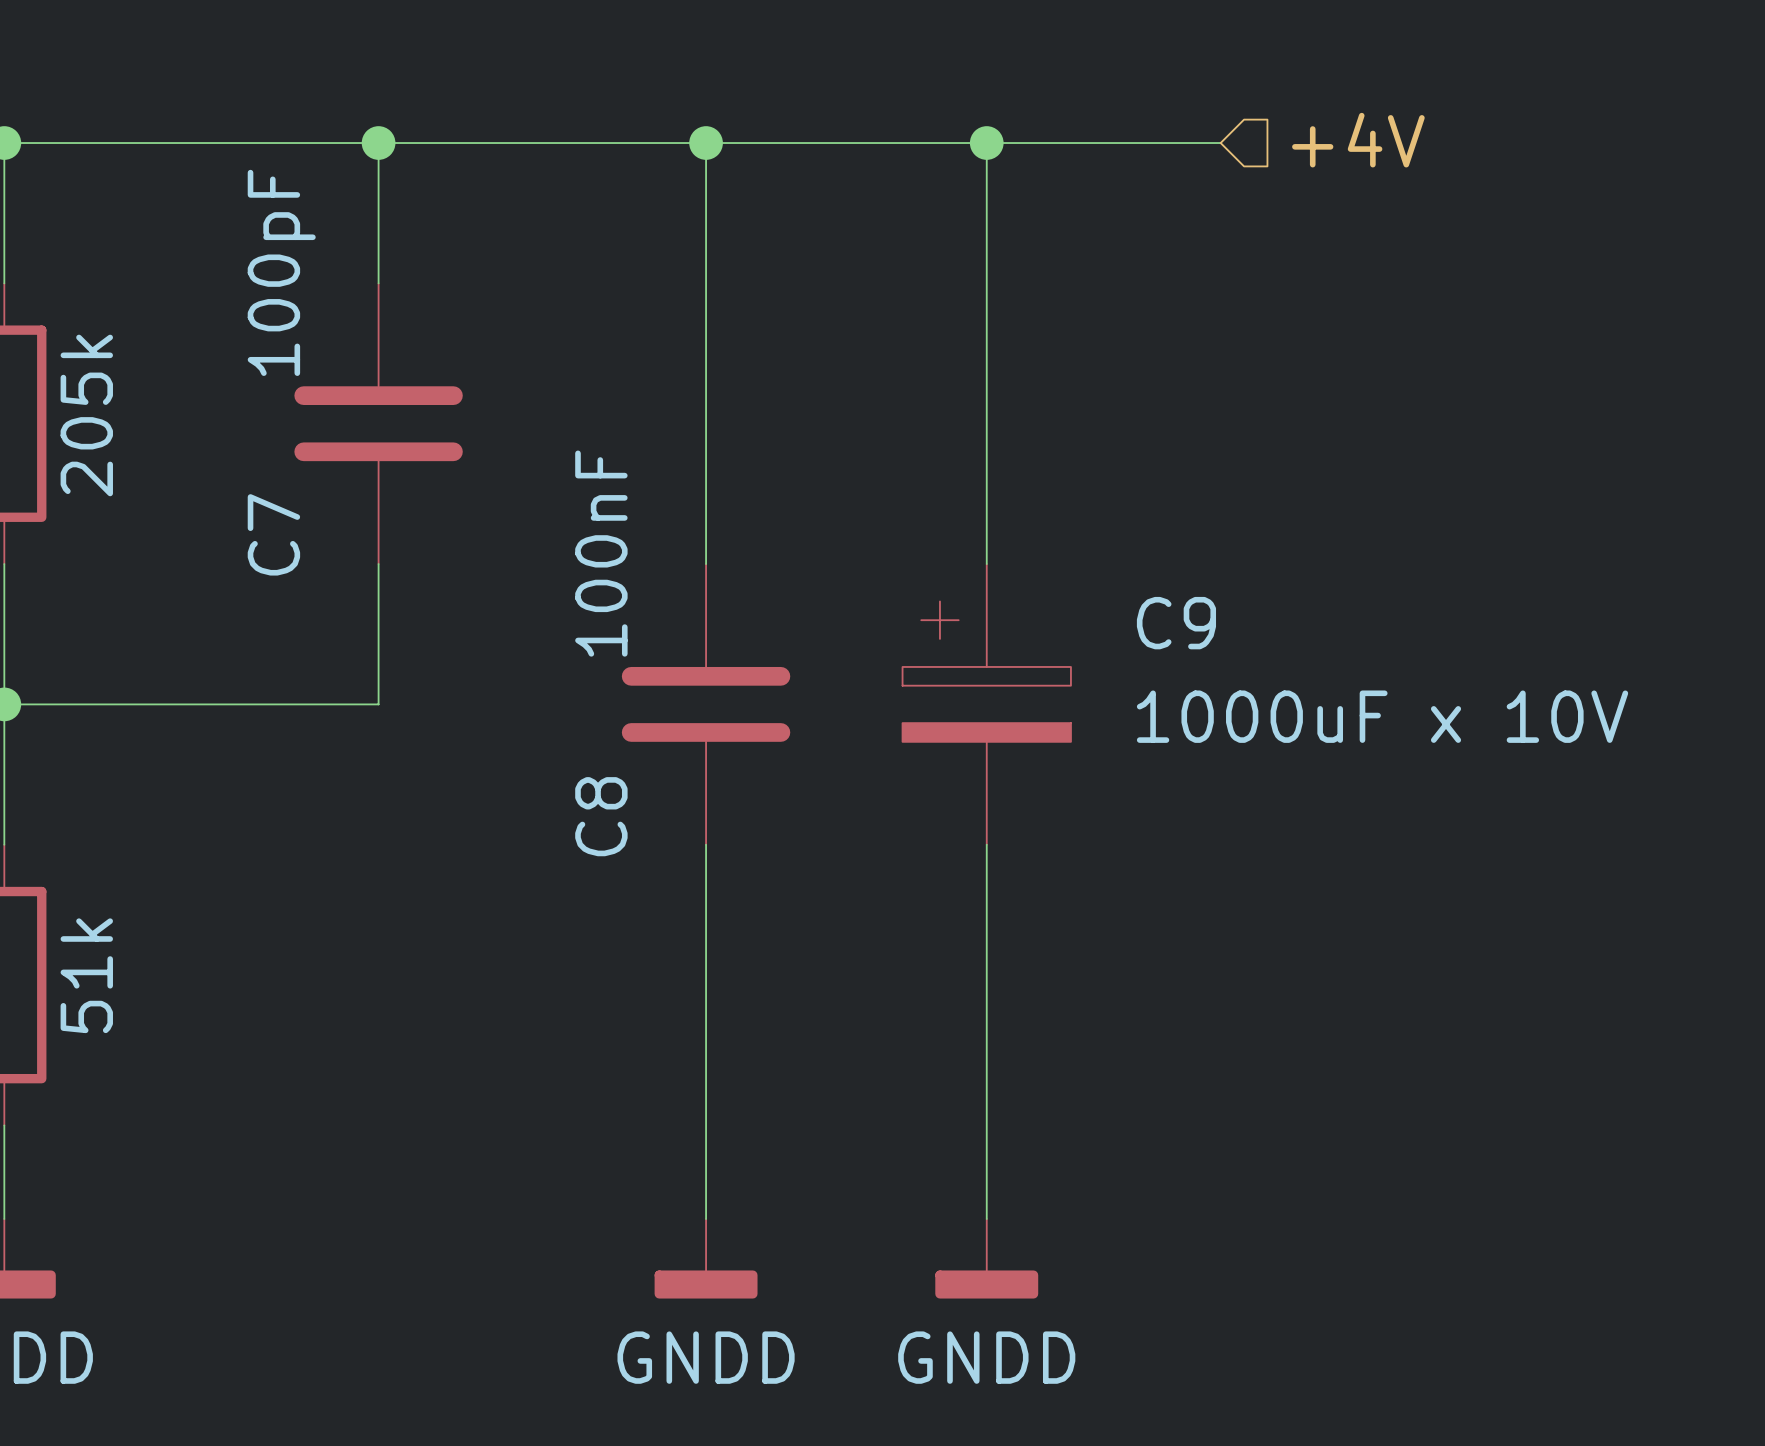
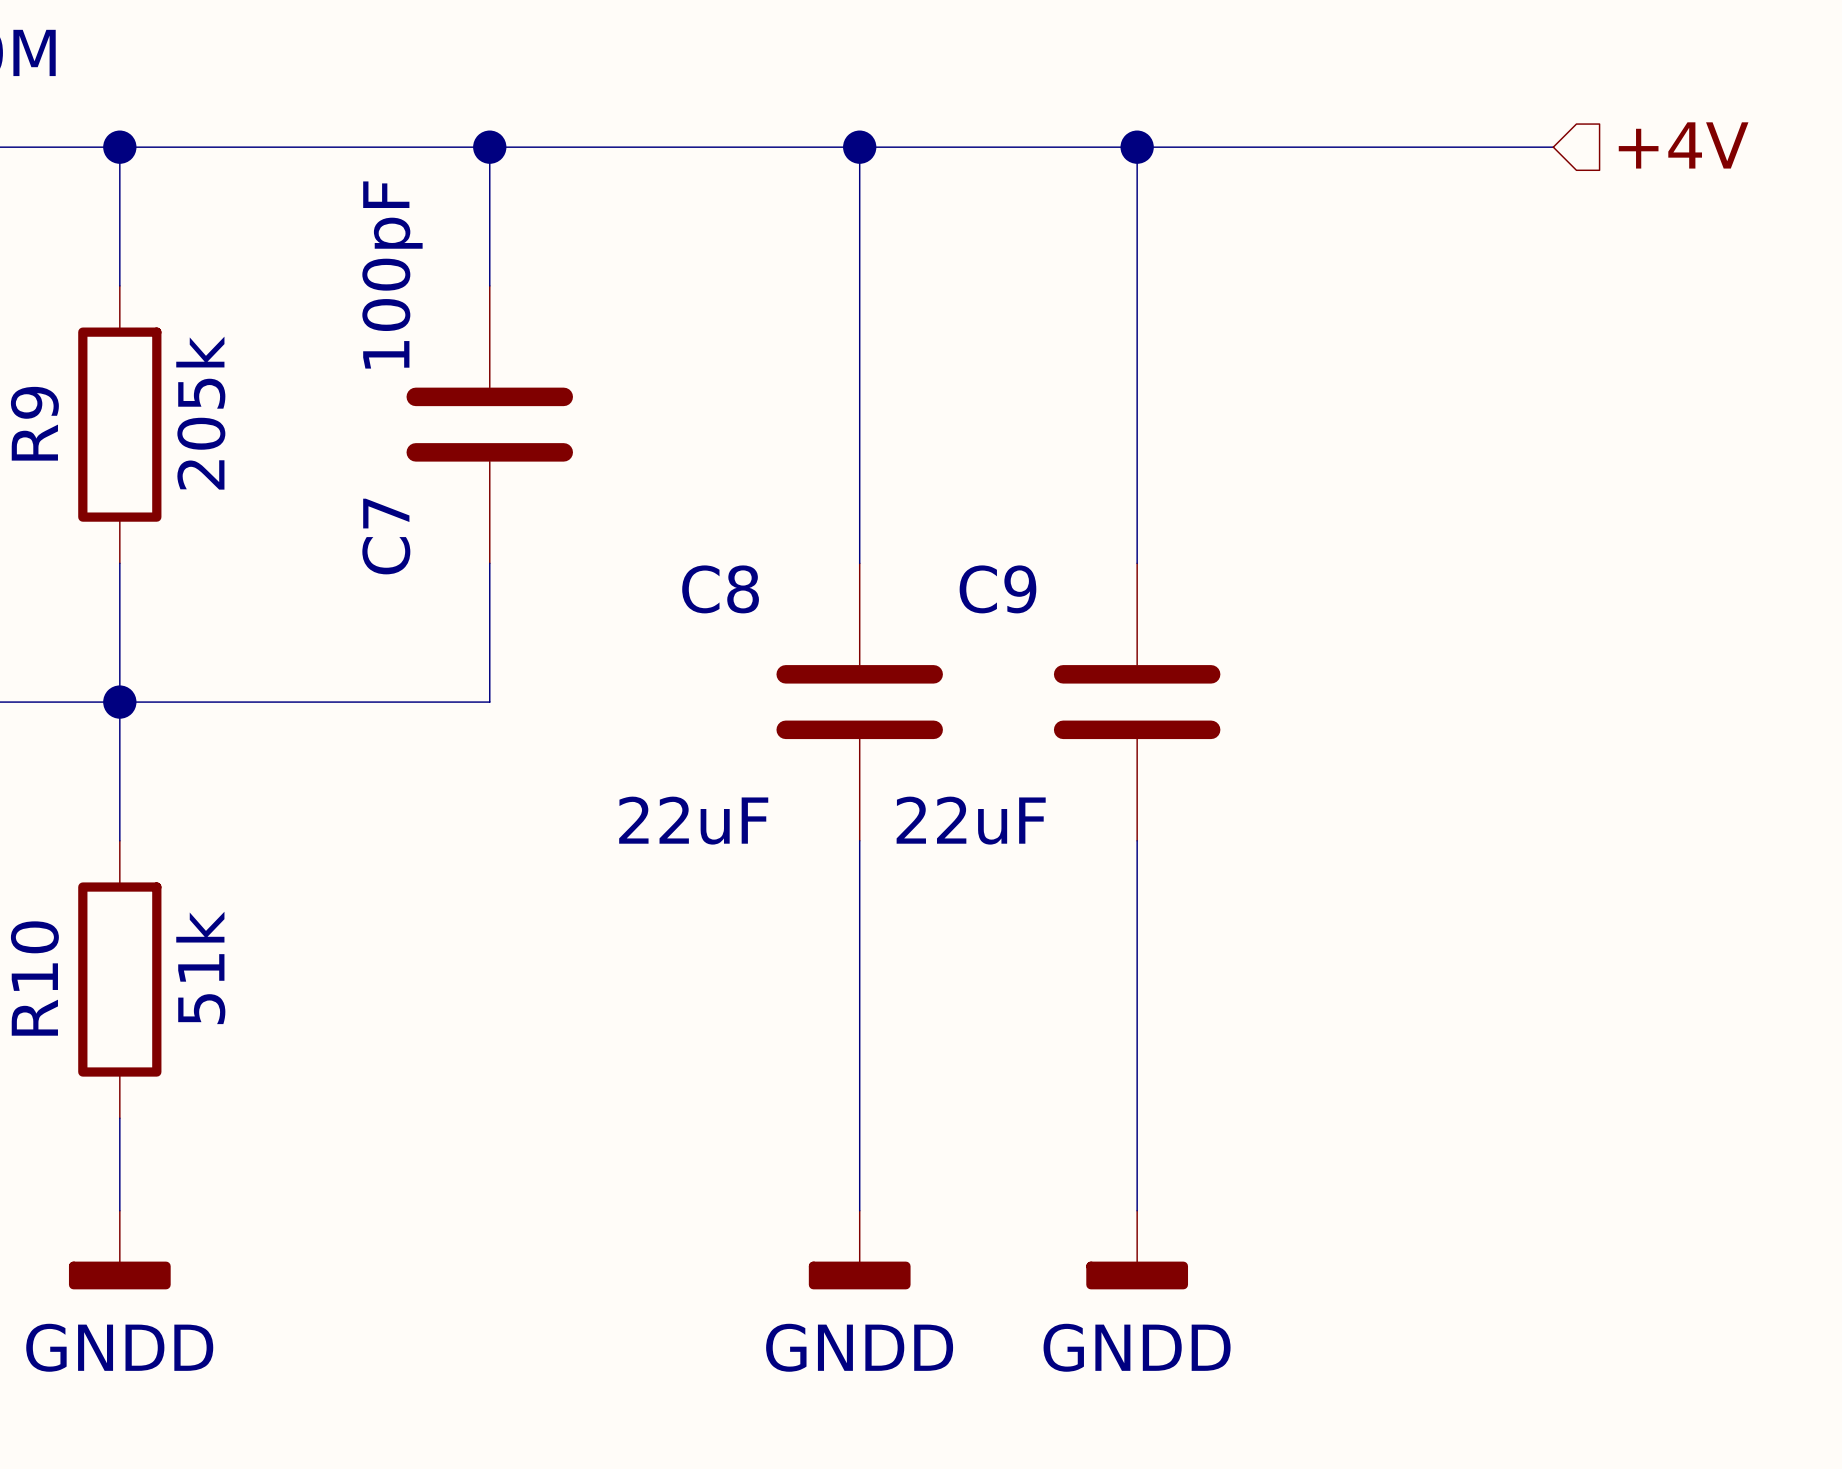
hierarchical label position: +4V (1358, 140) -> +4V (1683, 145)
wire: (706, 143) (706, 564) -> (859, 147) (859, 563)
junction position: (706, 143) -> (859, 147)
wire: (986, 143) (986, 564) -> (1137, 147) (1137, 563)
junction position: (986, 143) -> (1137, 147)
wire: none -> (1322, 147) (1553, 147)
C8 value: 100nF (601, 553) -> 22uF (693, 820)
C9 symbol: [902, 564, 1071, 845] -> [1053, 563, 1221, 841]
C9 name position: C9 (1176, 623) -> C9 (997, 589)
C8 position: (706, 704) -> (859, 702)
C9 value: 1000uF x 10V (1382, 716) -> 22uF (971, 820)
C8 name rotation: 0° (601, 816) -> 90° clockwise (720, 589)
C8 name position: C8 (601, 816) -> C8 (720, 589)
wire: (706, 844) (706, 1219) -> (859, 840) (859, 1210)
wire: (986, 844) (986, 1219) -> (1137, 840) (1137, 1210)
power symbol position: GNDD (706, 1258) -> GNDD (859, 1250)
power symbol position: GNDD (986, 1258) -> GNDD (1137, 1250)

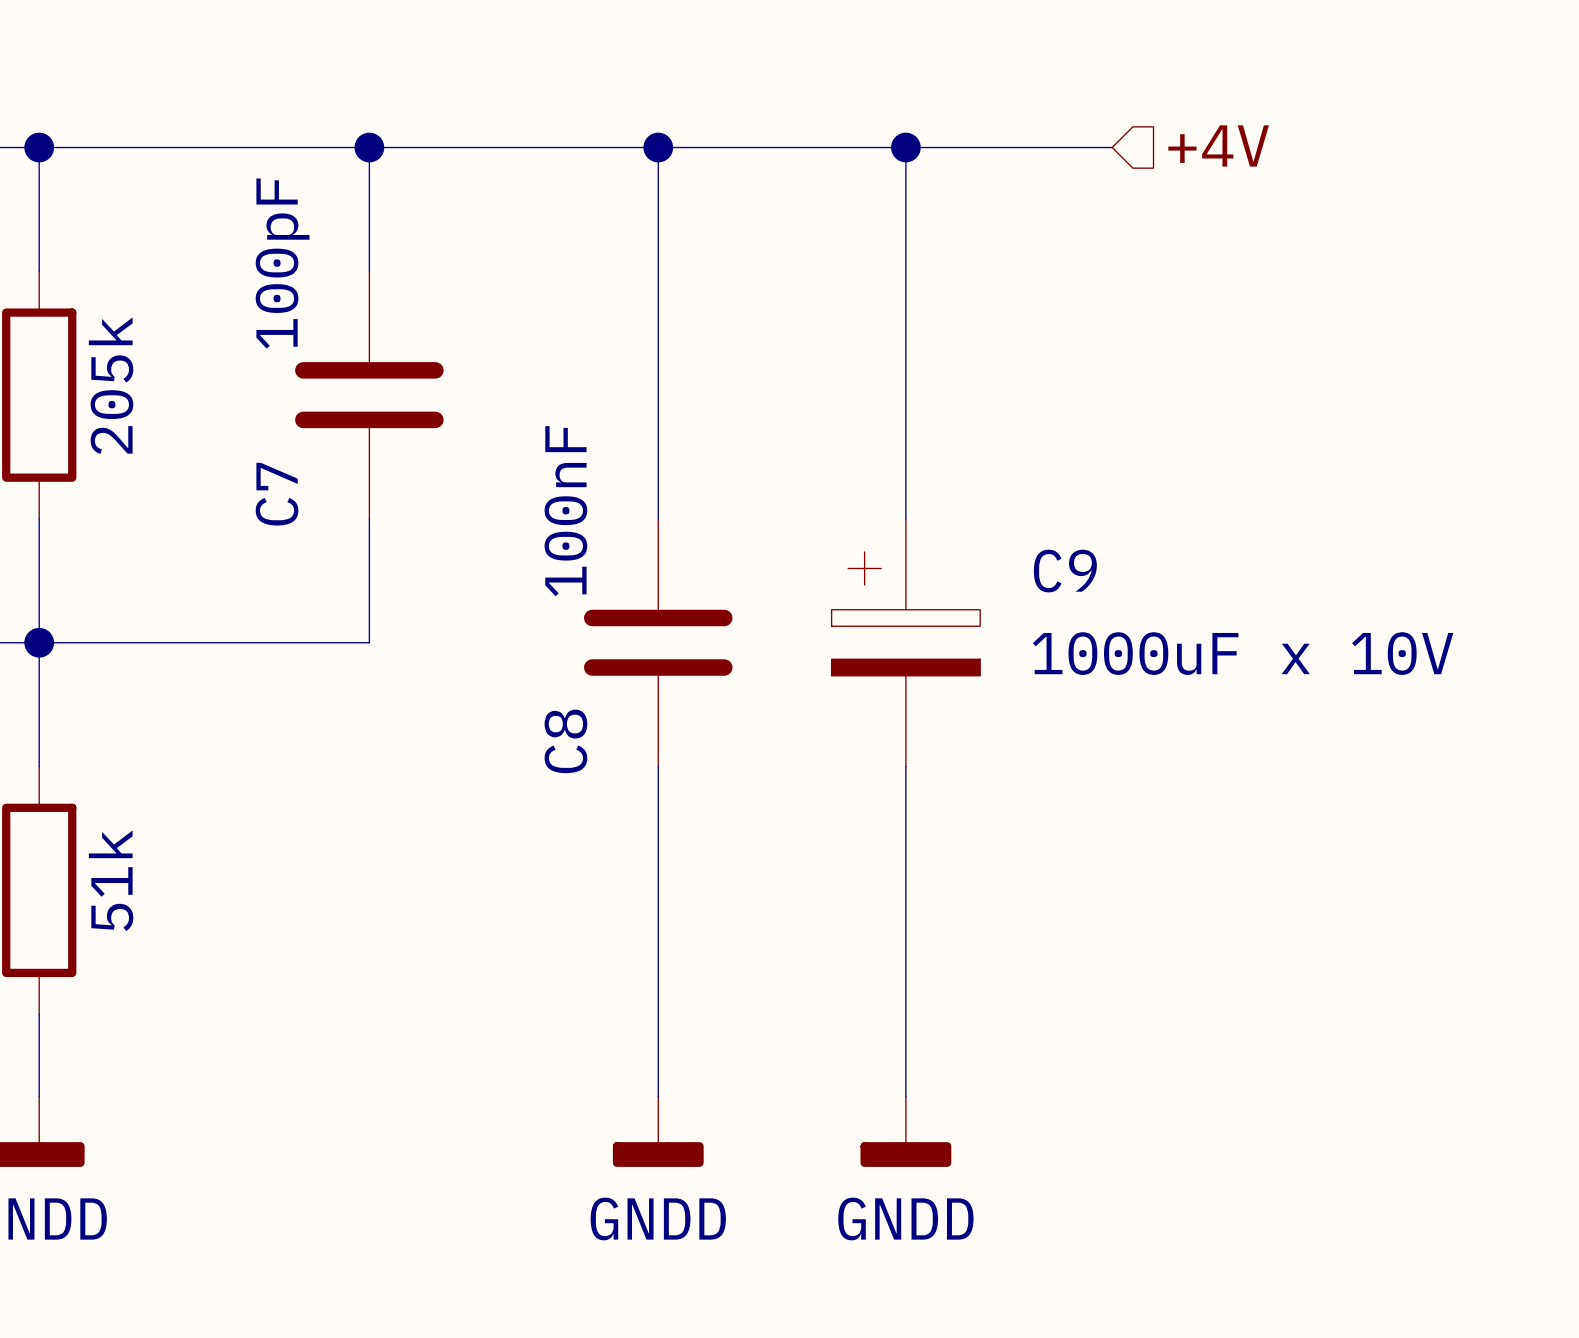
hierarchical label position: +4V (1683, 145) -> +4V (1218, 145)
wire: (859, 147) (859, 563) -> (658, 147) (658, 518)
junction position: (859, 147) -> (658, 147)
wire: (1137, 147) (1137, 563) -> (905, 147) (905, 518)
junction position: (1137, 147) -> (905, 147)
wire: (1322, 147) (1553, 147) -> none
C9 symbol: [1053, 563, 1221, 841] -> [831, 518, 981, 767]
C8 name rotation: 0° (720, 589) -> 90° counterclockwise (565, 741)
C8 name position: C8 (720, 589) -> C8 (565, 741)
C9 name position: C9 (997, 589) -> C9 (1065, 571)
C8 position: (859, 702) -> (658, 642)
C8 value: 22uF (693, 820) -> 100nF (565, 511)
C9 value: 22uF (971, 820) -> 1000uF x 10V (1243, 653)
wire: (859, 840) (859, 1210) -> (658, 766) (658, 1096)
wire: (1137, 840) (1137, 1210) -> (905, 766) (905, 1096)
power symbol position: GNDD (859, 1250) -> GNDD (658, 1131)
power symbol position: GNDD (1137, 1250) -> GNDD (905, 1131)

